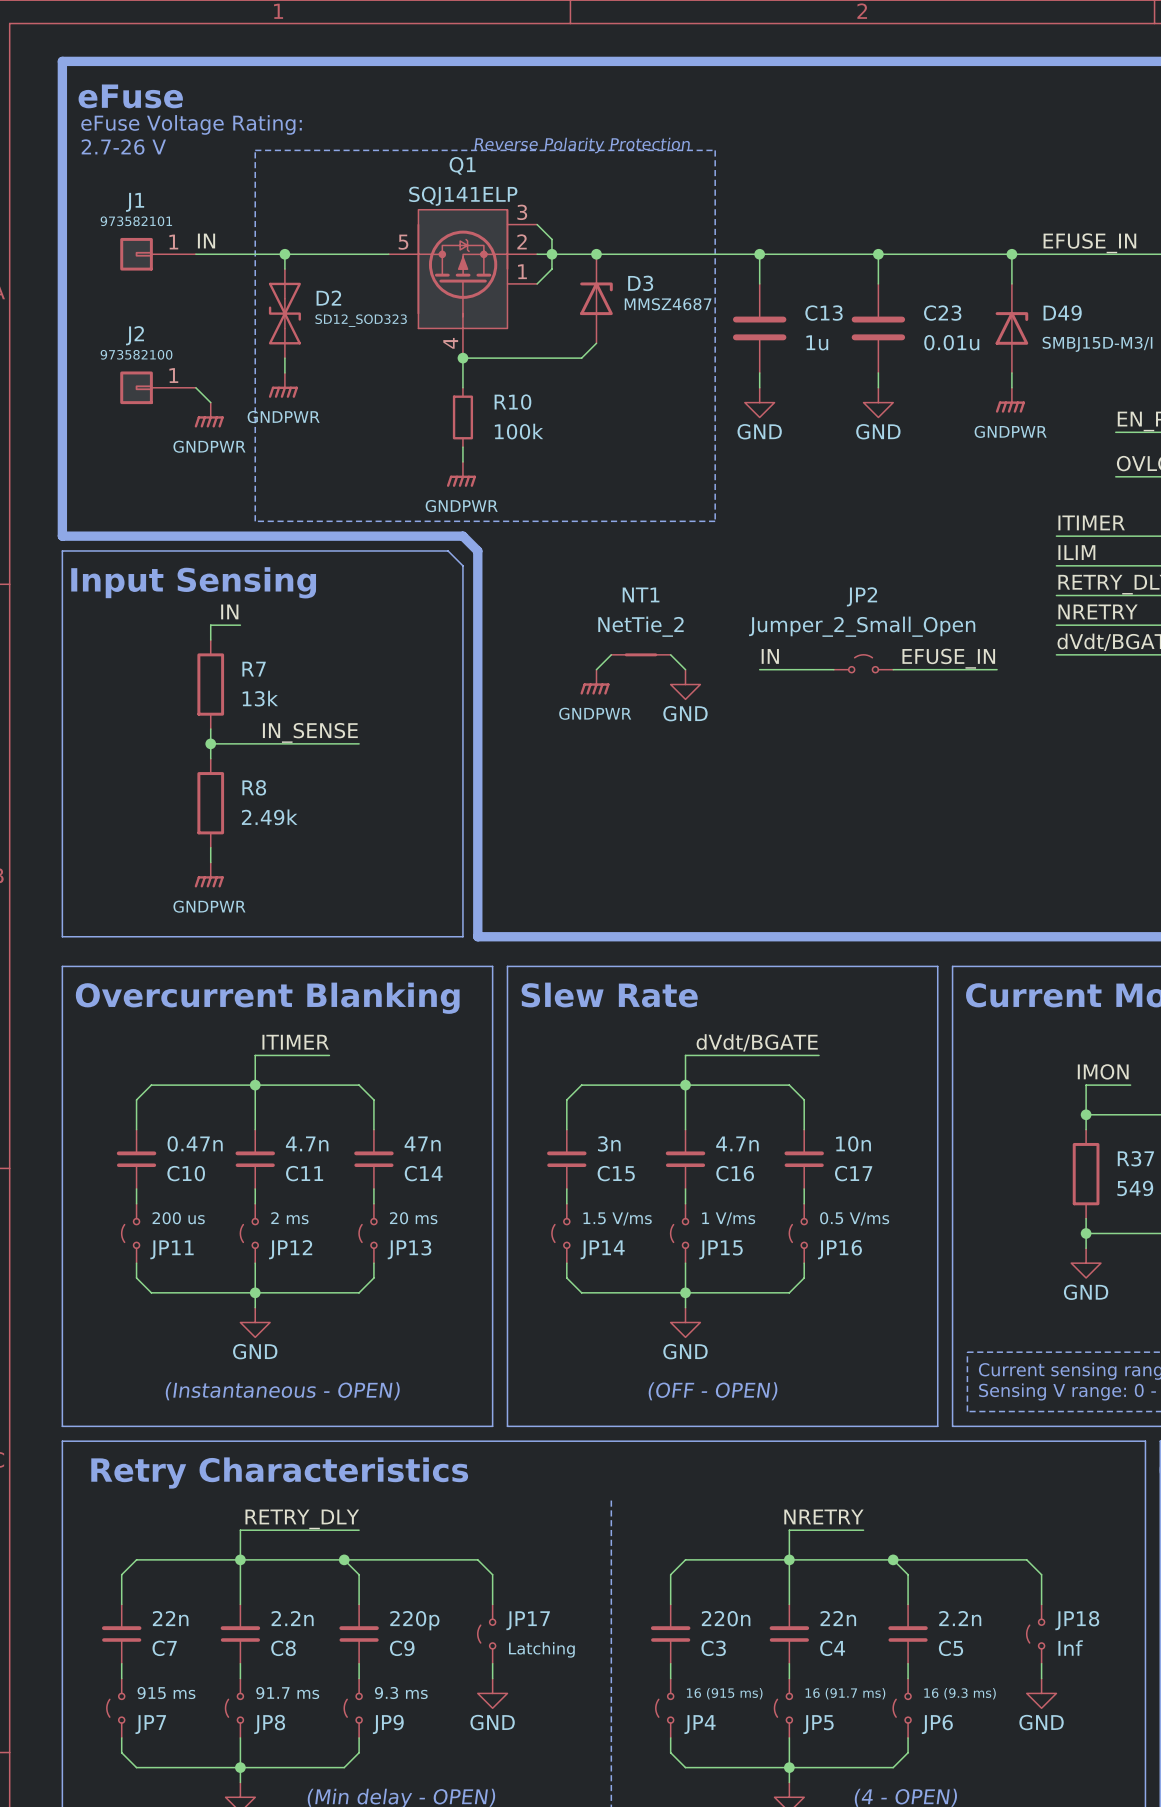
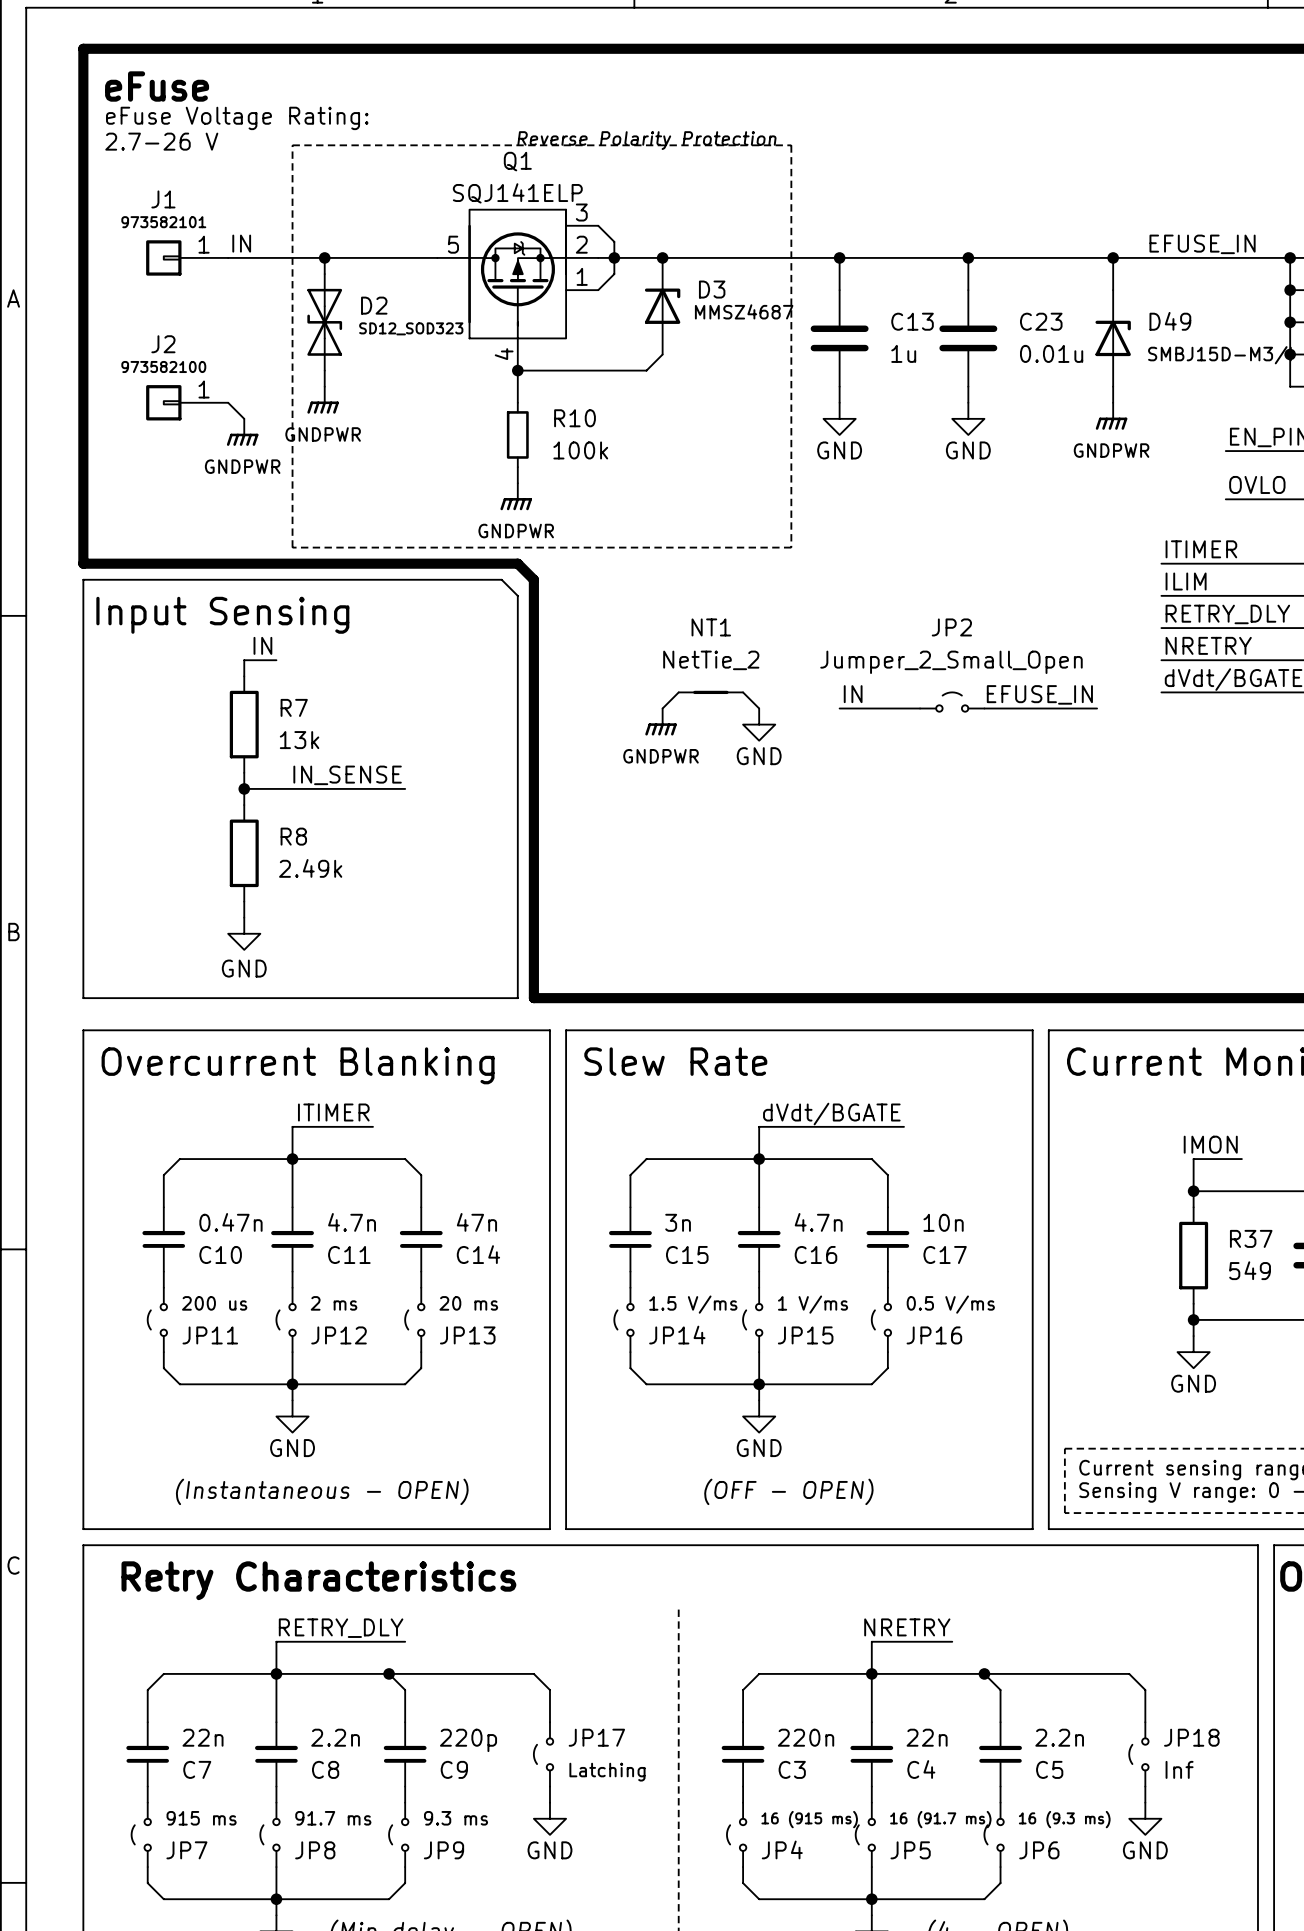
power symbol: GNDPWR (209, 875) -> GND (244, 933)

